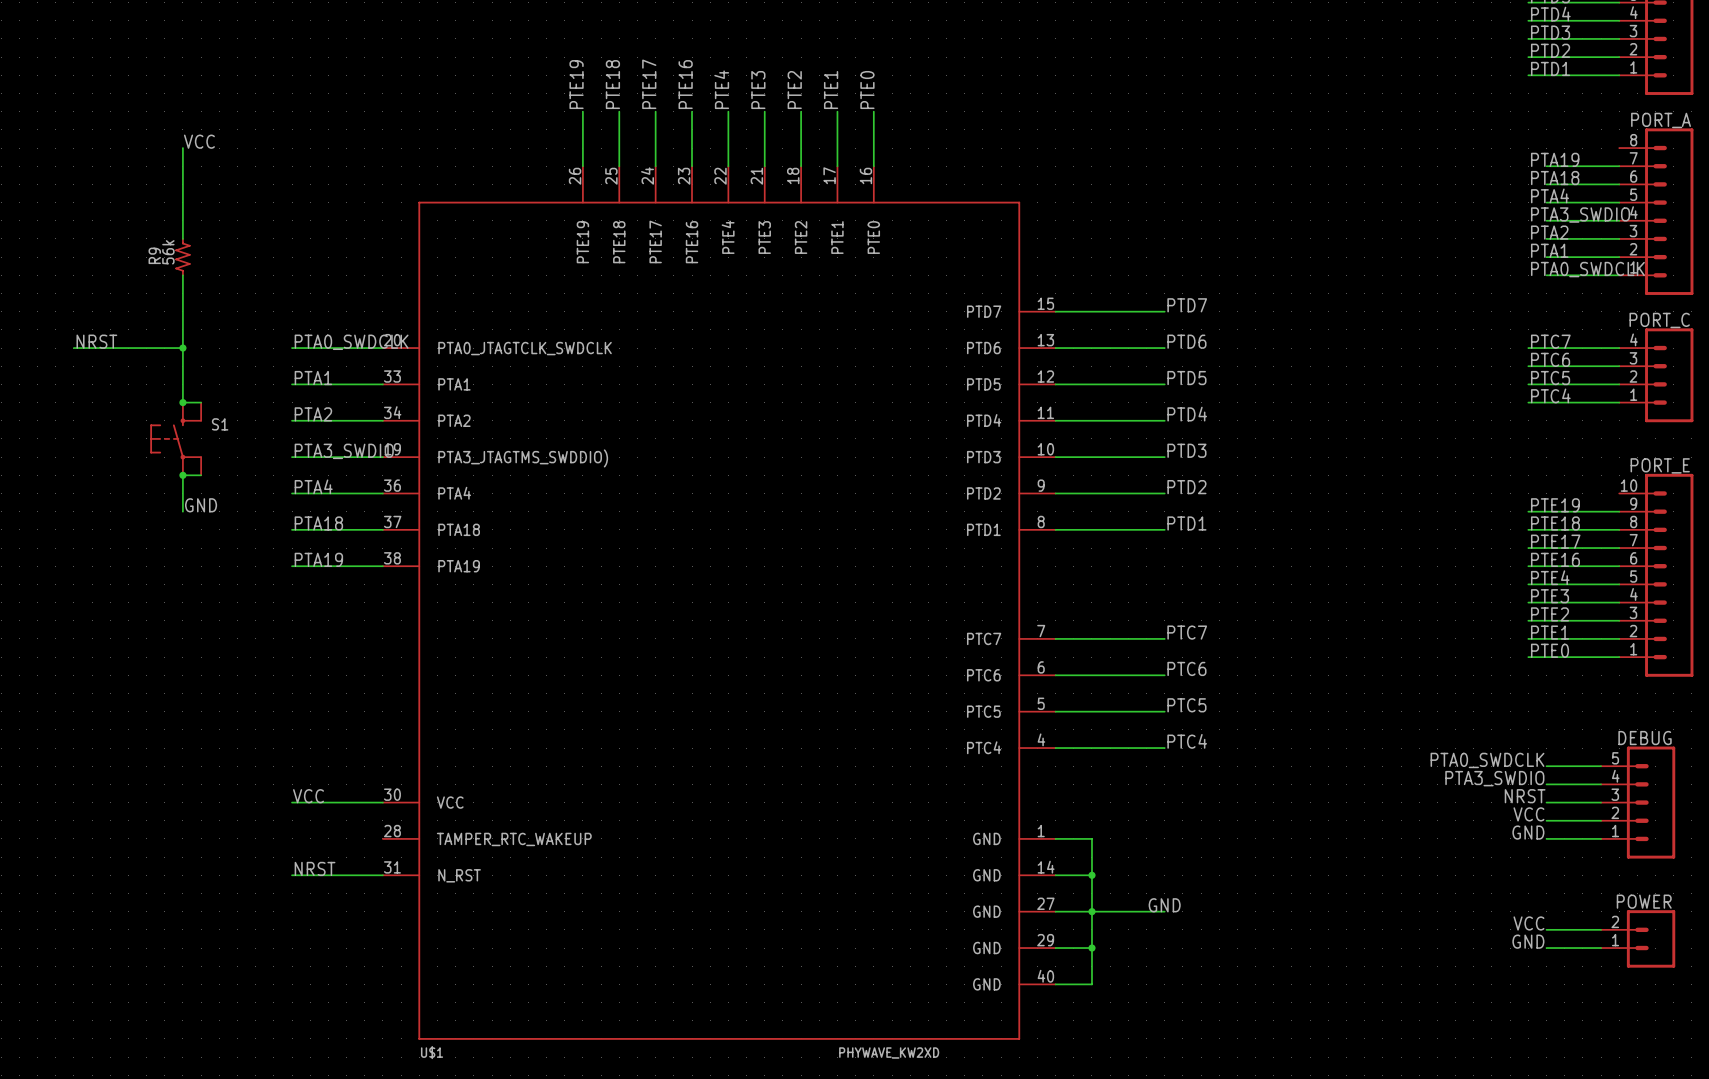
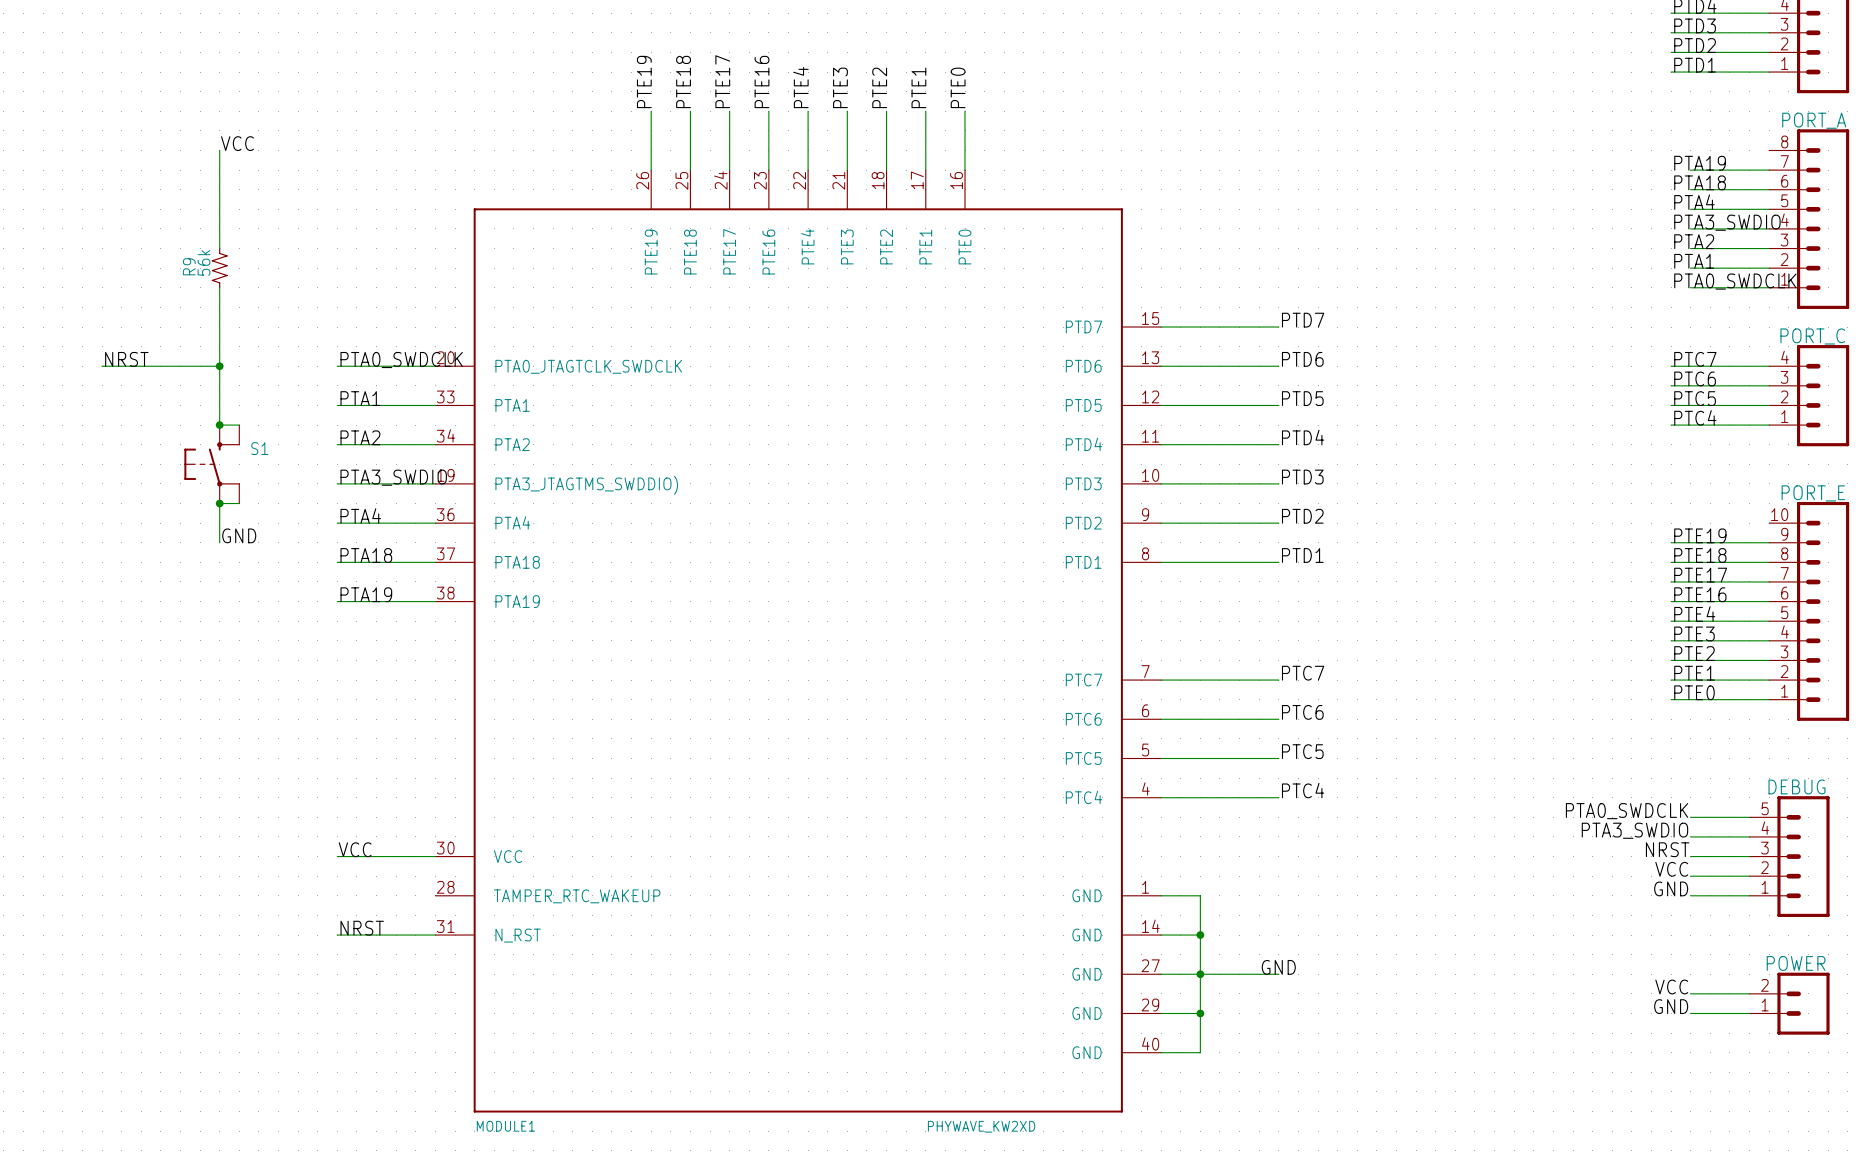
U$1 name: U$1 (432, 1052) -> MODULE1 (505, 1126)

